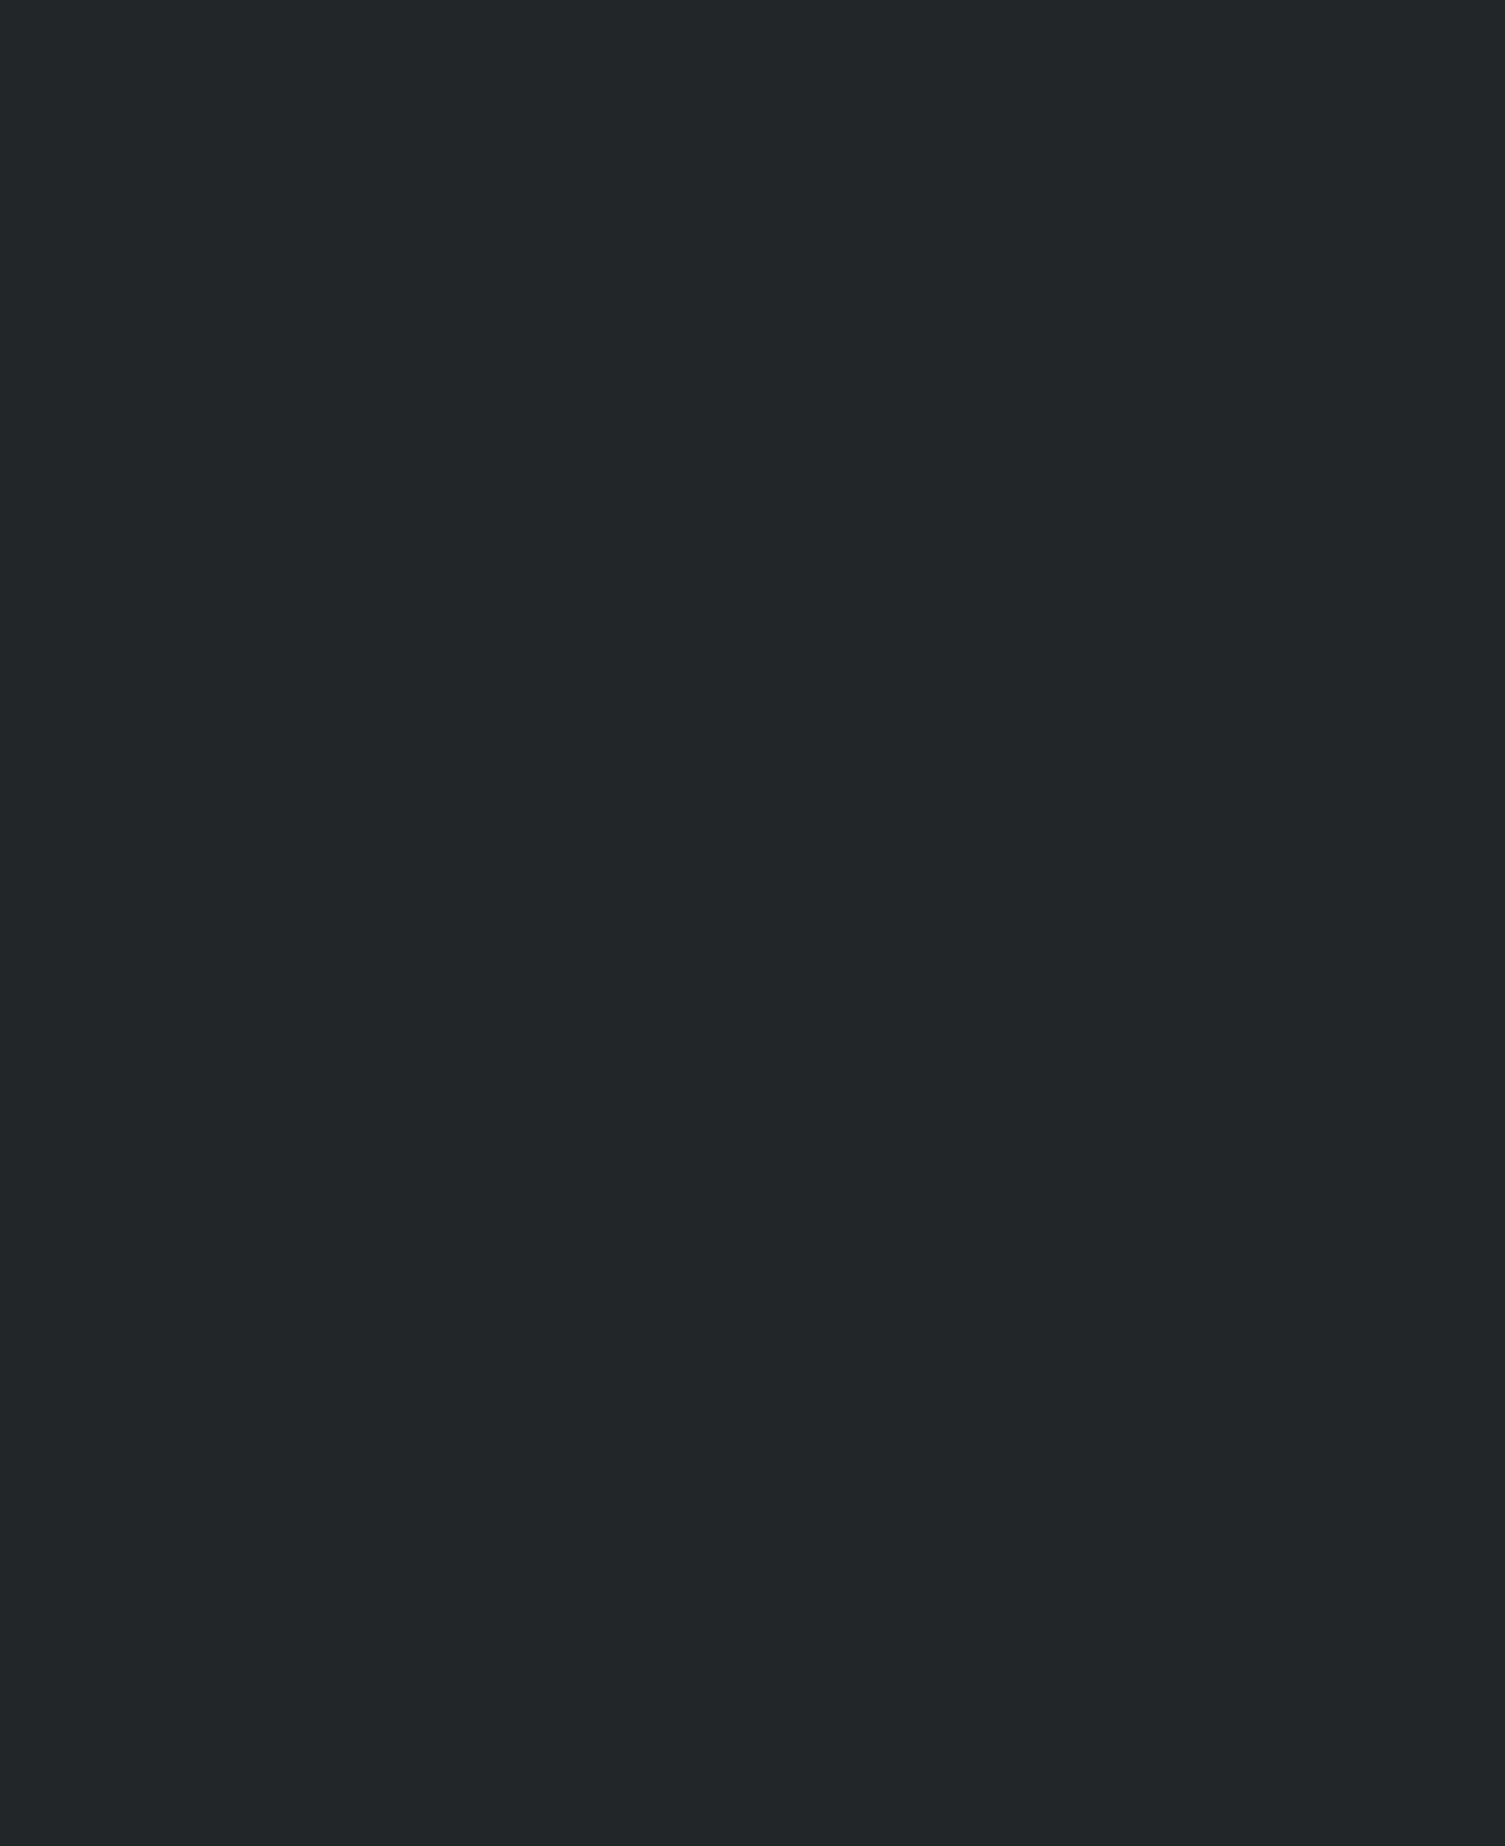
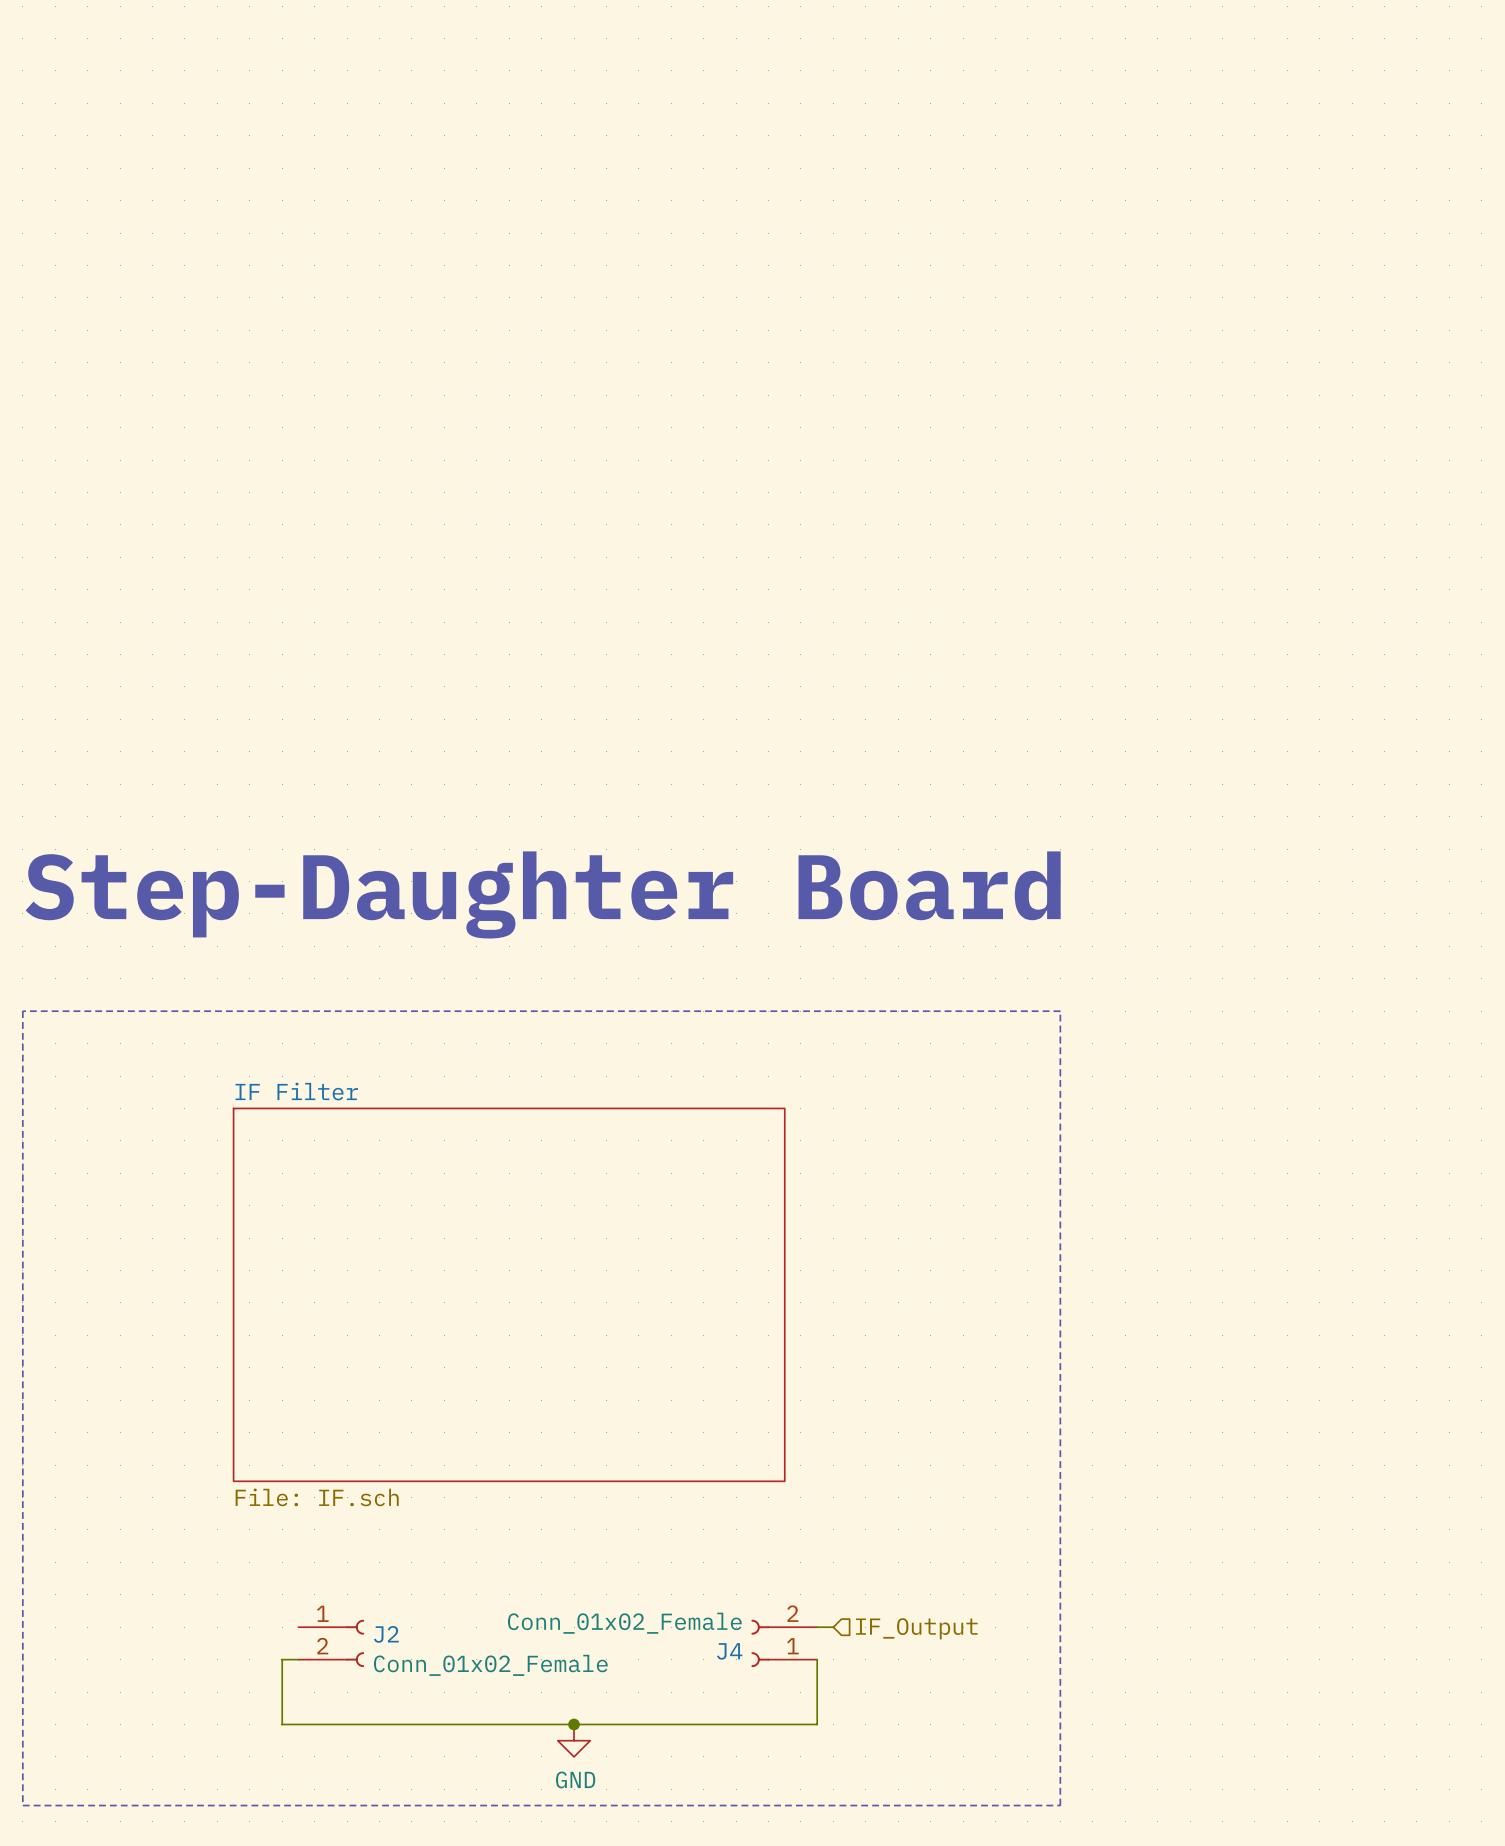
text: none -> Step-Daughter Board (543, 894)
line: none -> (22, 1011) (22, 1805) (1060, 1805) (1060, 1011) (22, 1011)
sheet IF Filter: none -> File: IF.sch (509, 1294)
wire: none -> (817, 1627) (833, 1627)
hierarchical label: none -> IF_Output (916, 1628)
J2: none -> Conn_01x02_Female (331, 1643)
J4: none -> Conn_01x02_Female (784, 1643)
wire: none -> (298, 1659) (282, 1659) (282, 1724) (817, 1724) (817, 1659)
junction: none -> (574, 1724)
power symbol: none -> GND (574, 1740)

